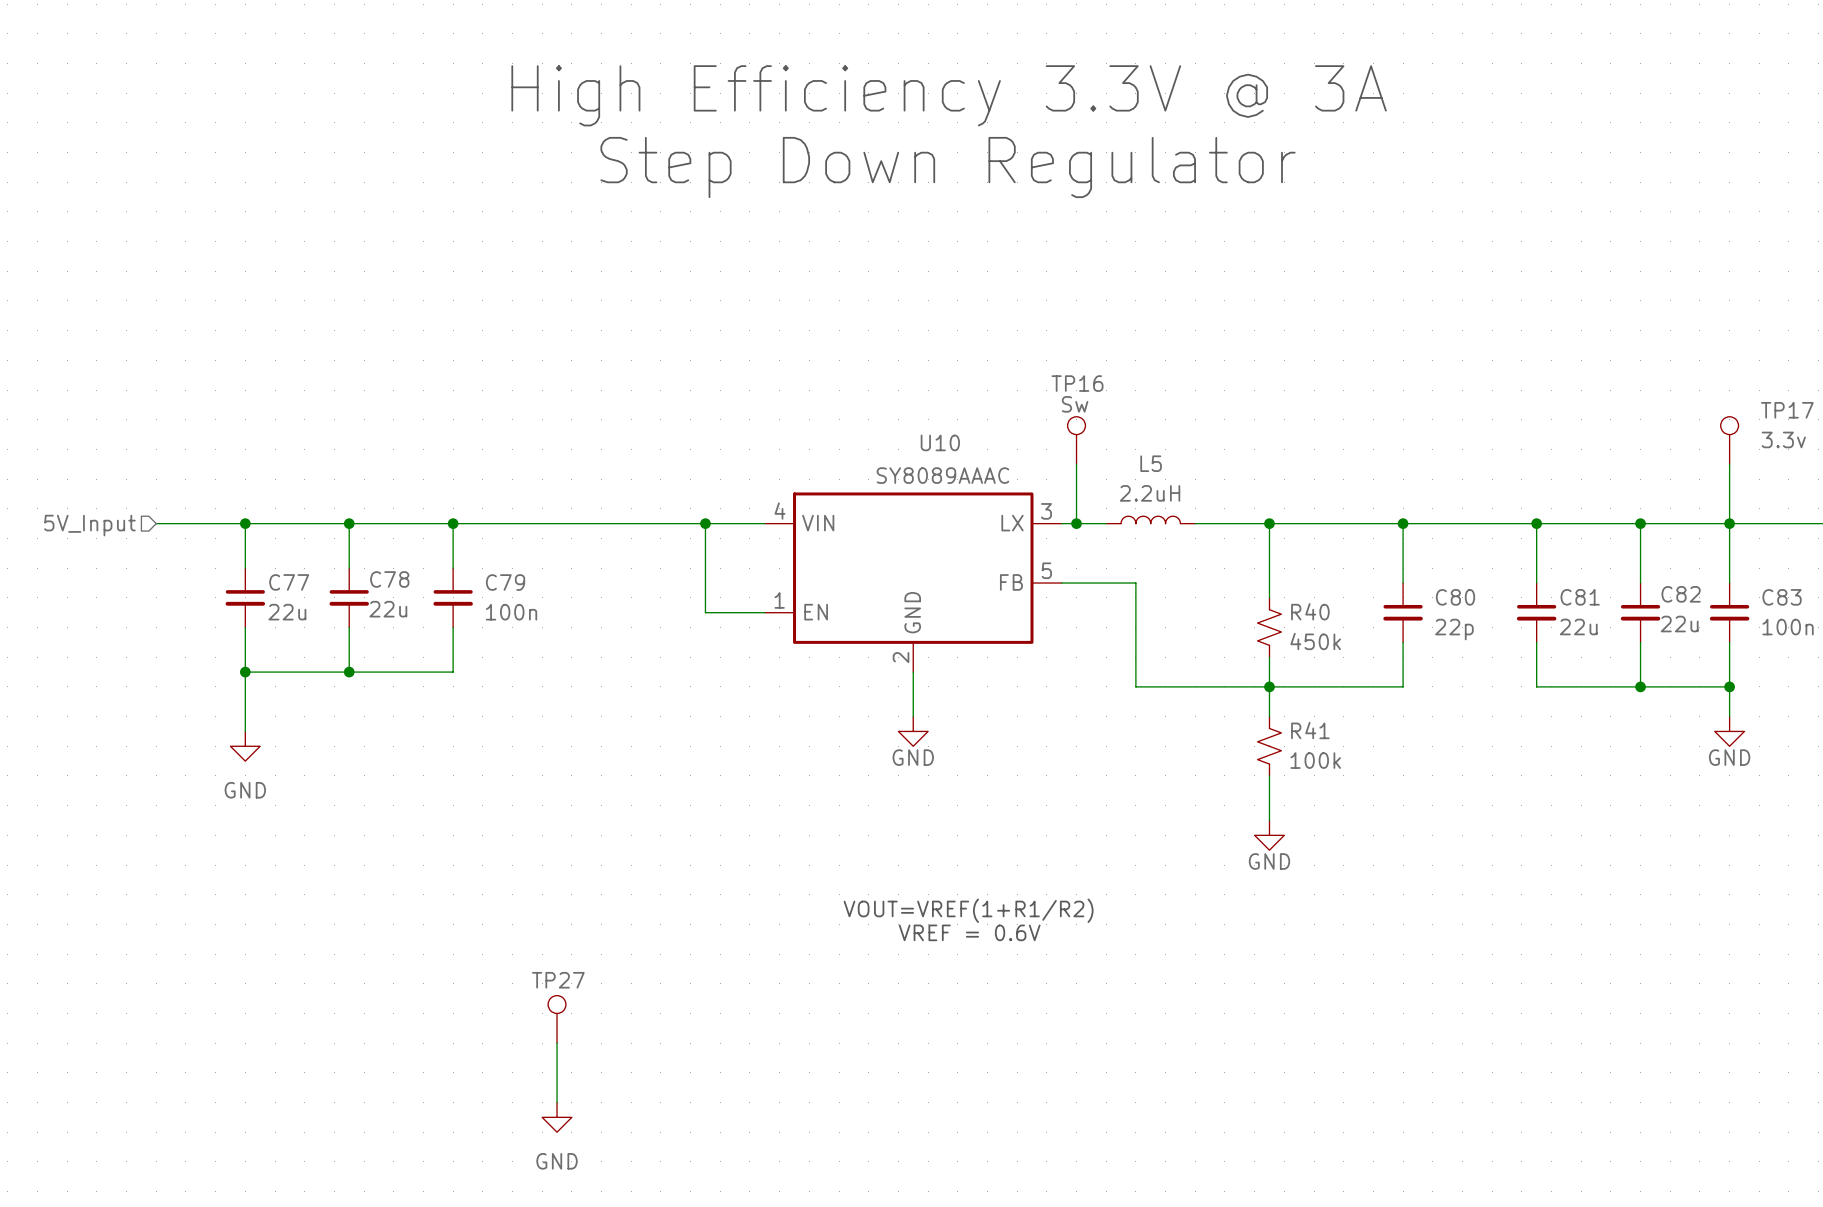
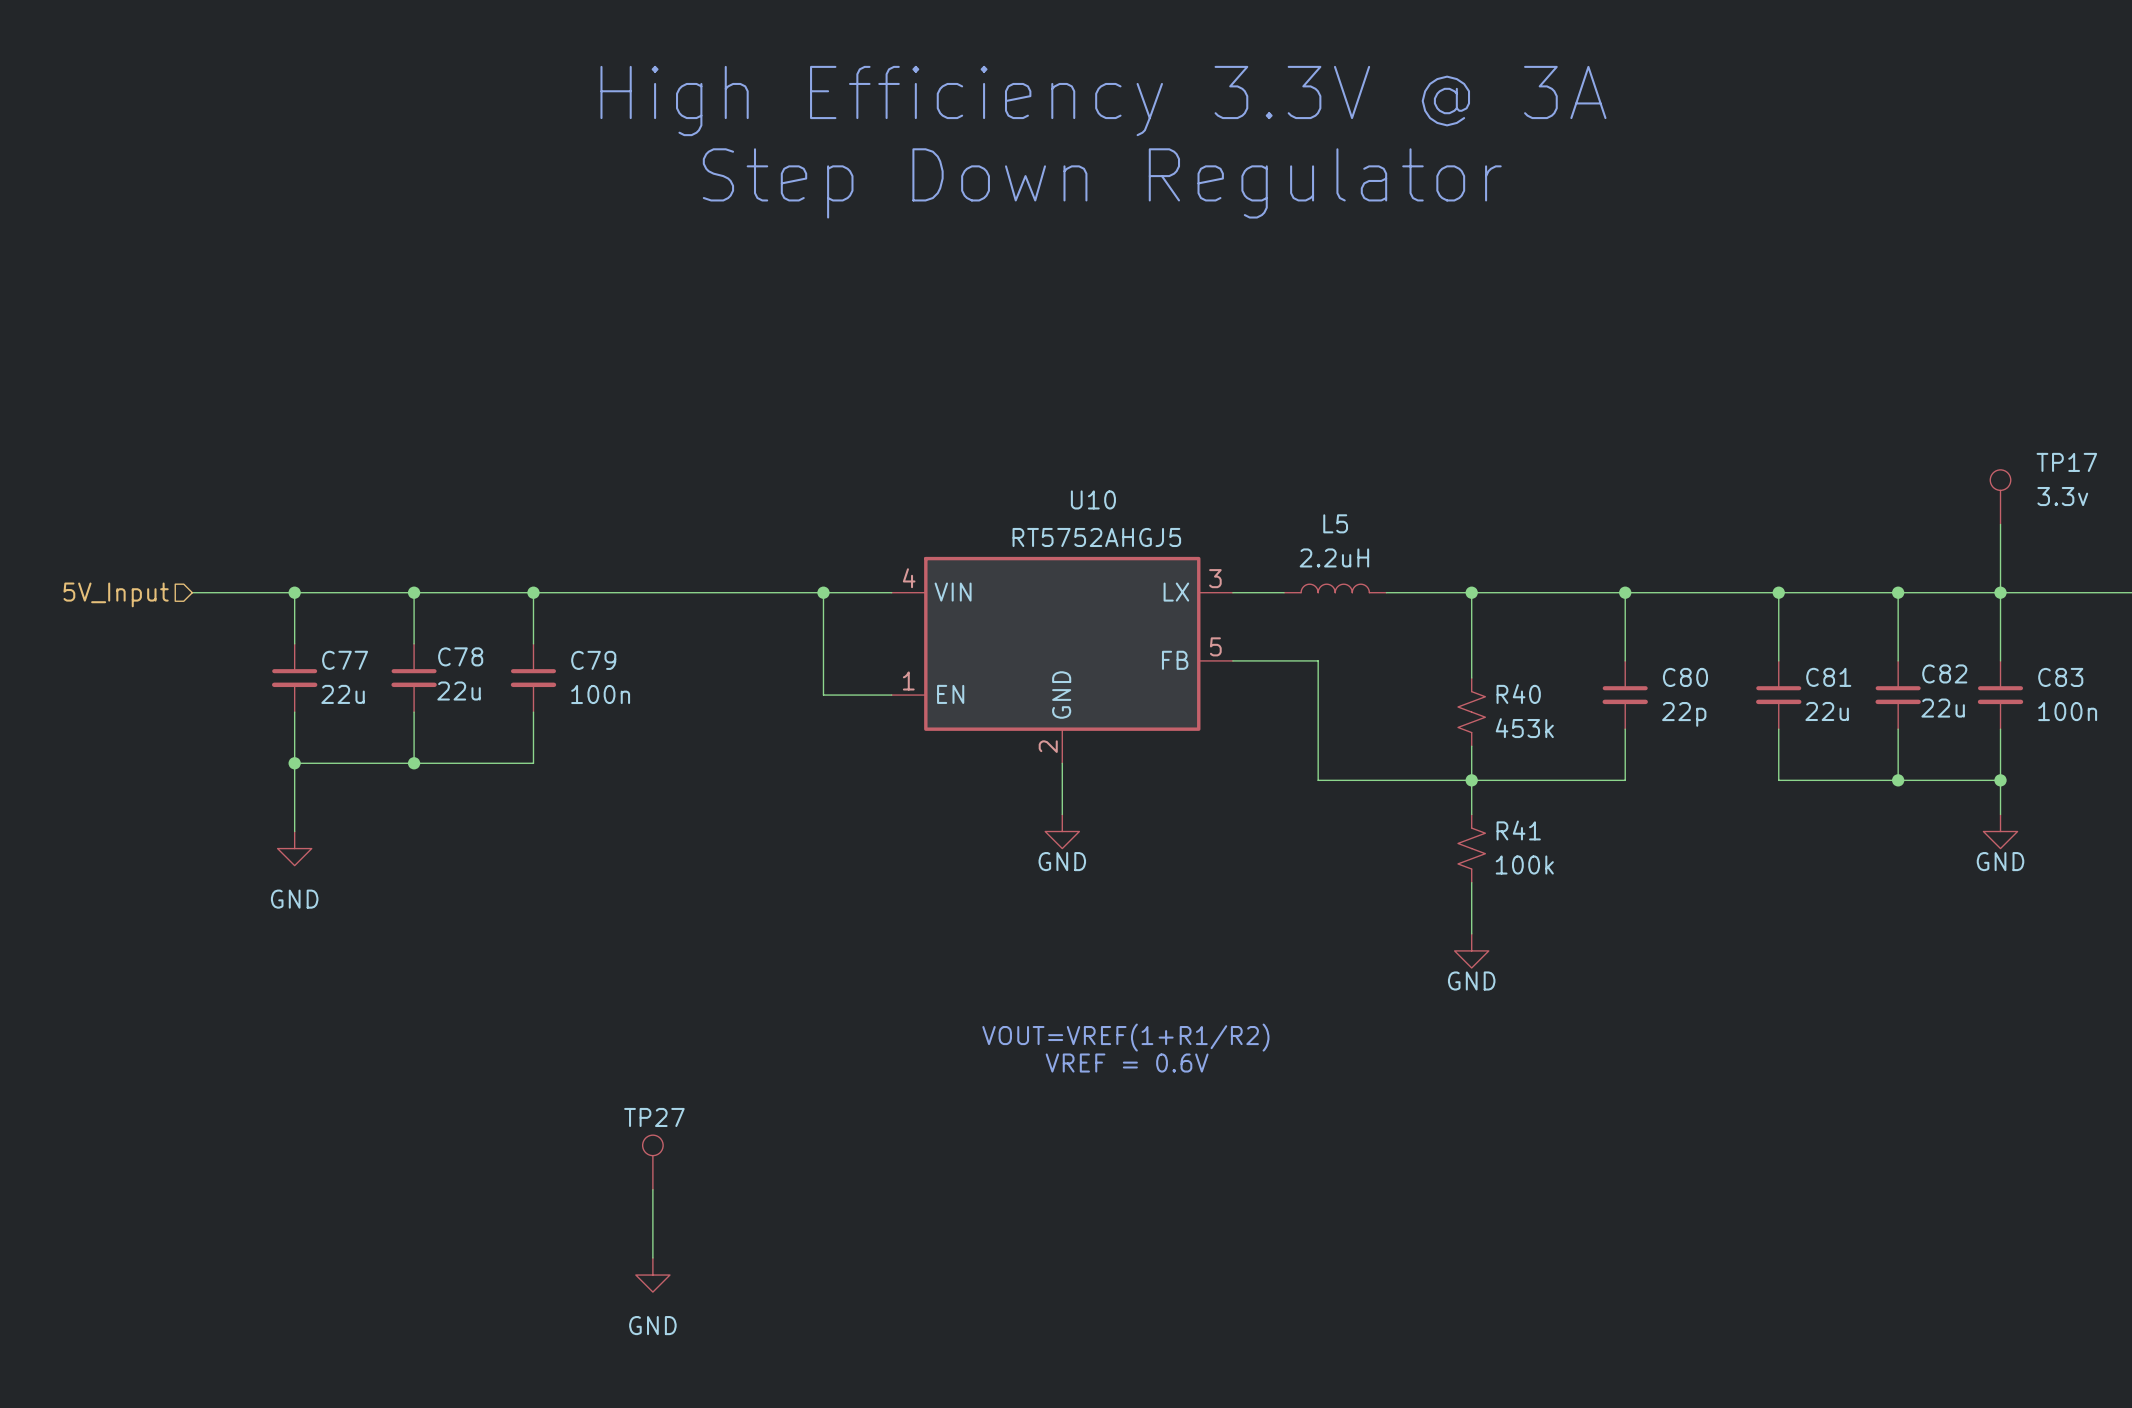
TP16: Sw (1076, 440) -> none
wire: (1076, 464) (1076, 523) -> none
U10 value: SY8089AAAC (942, 475) -> RT5752AHGJ5 (1096, 537)
junction: (1076, 523) -> none
R40 value: 450k (1315, 641) -> 453k (1524, 728)

